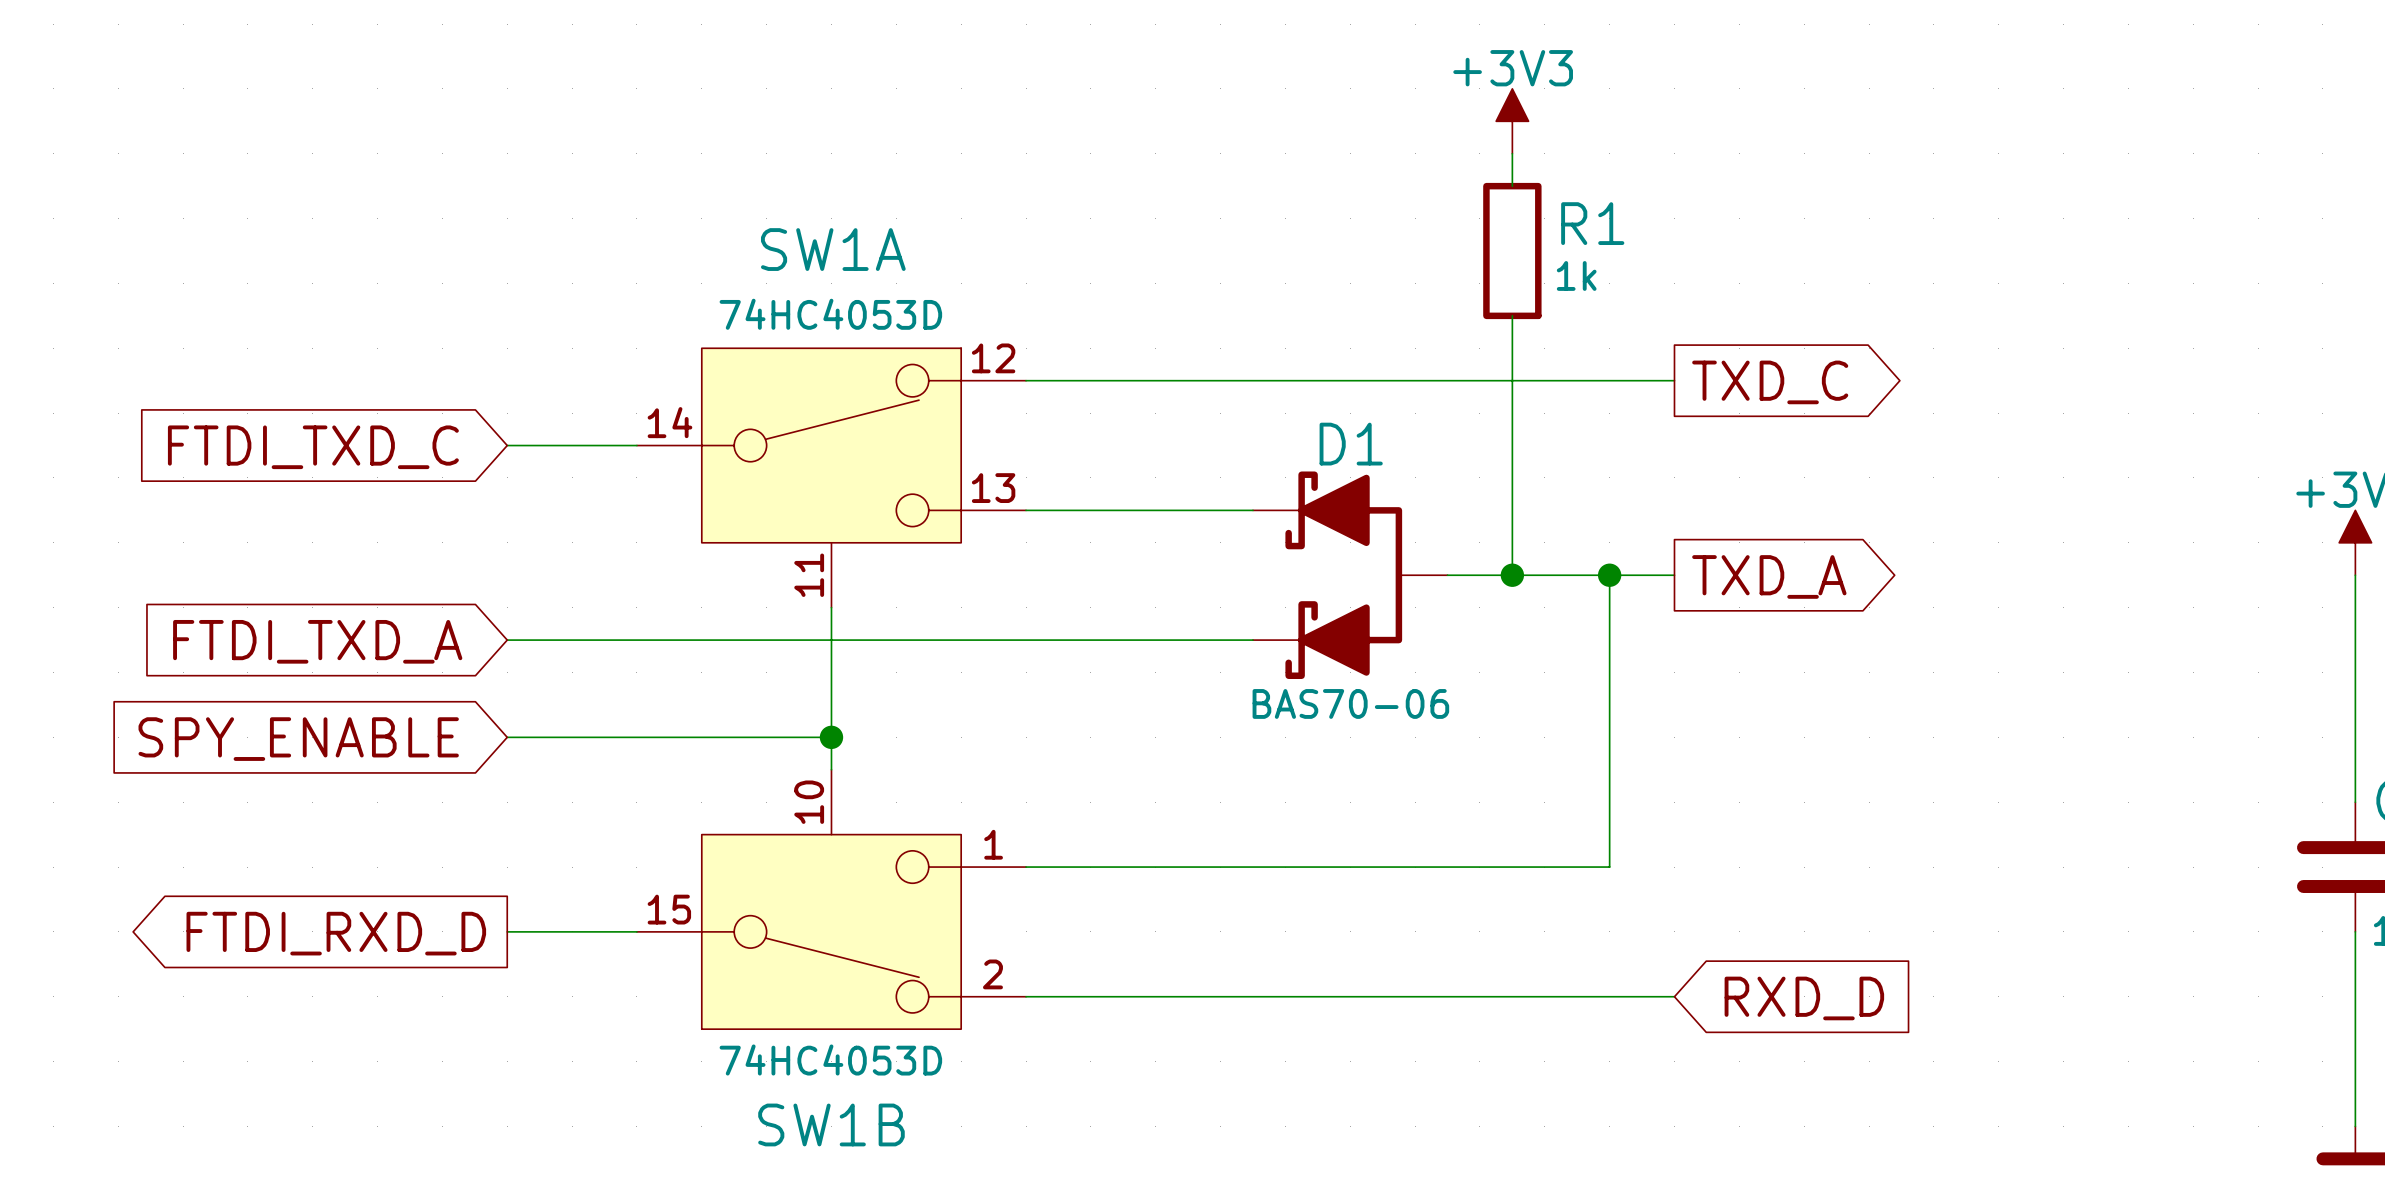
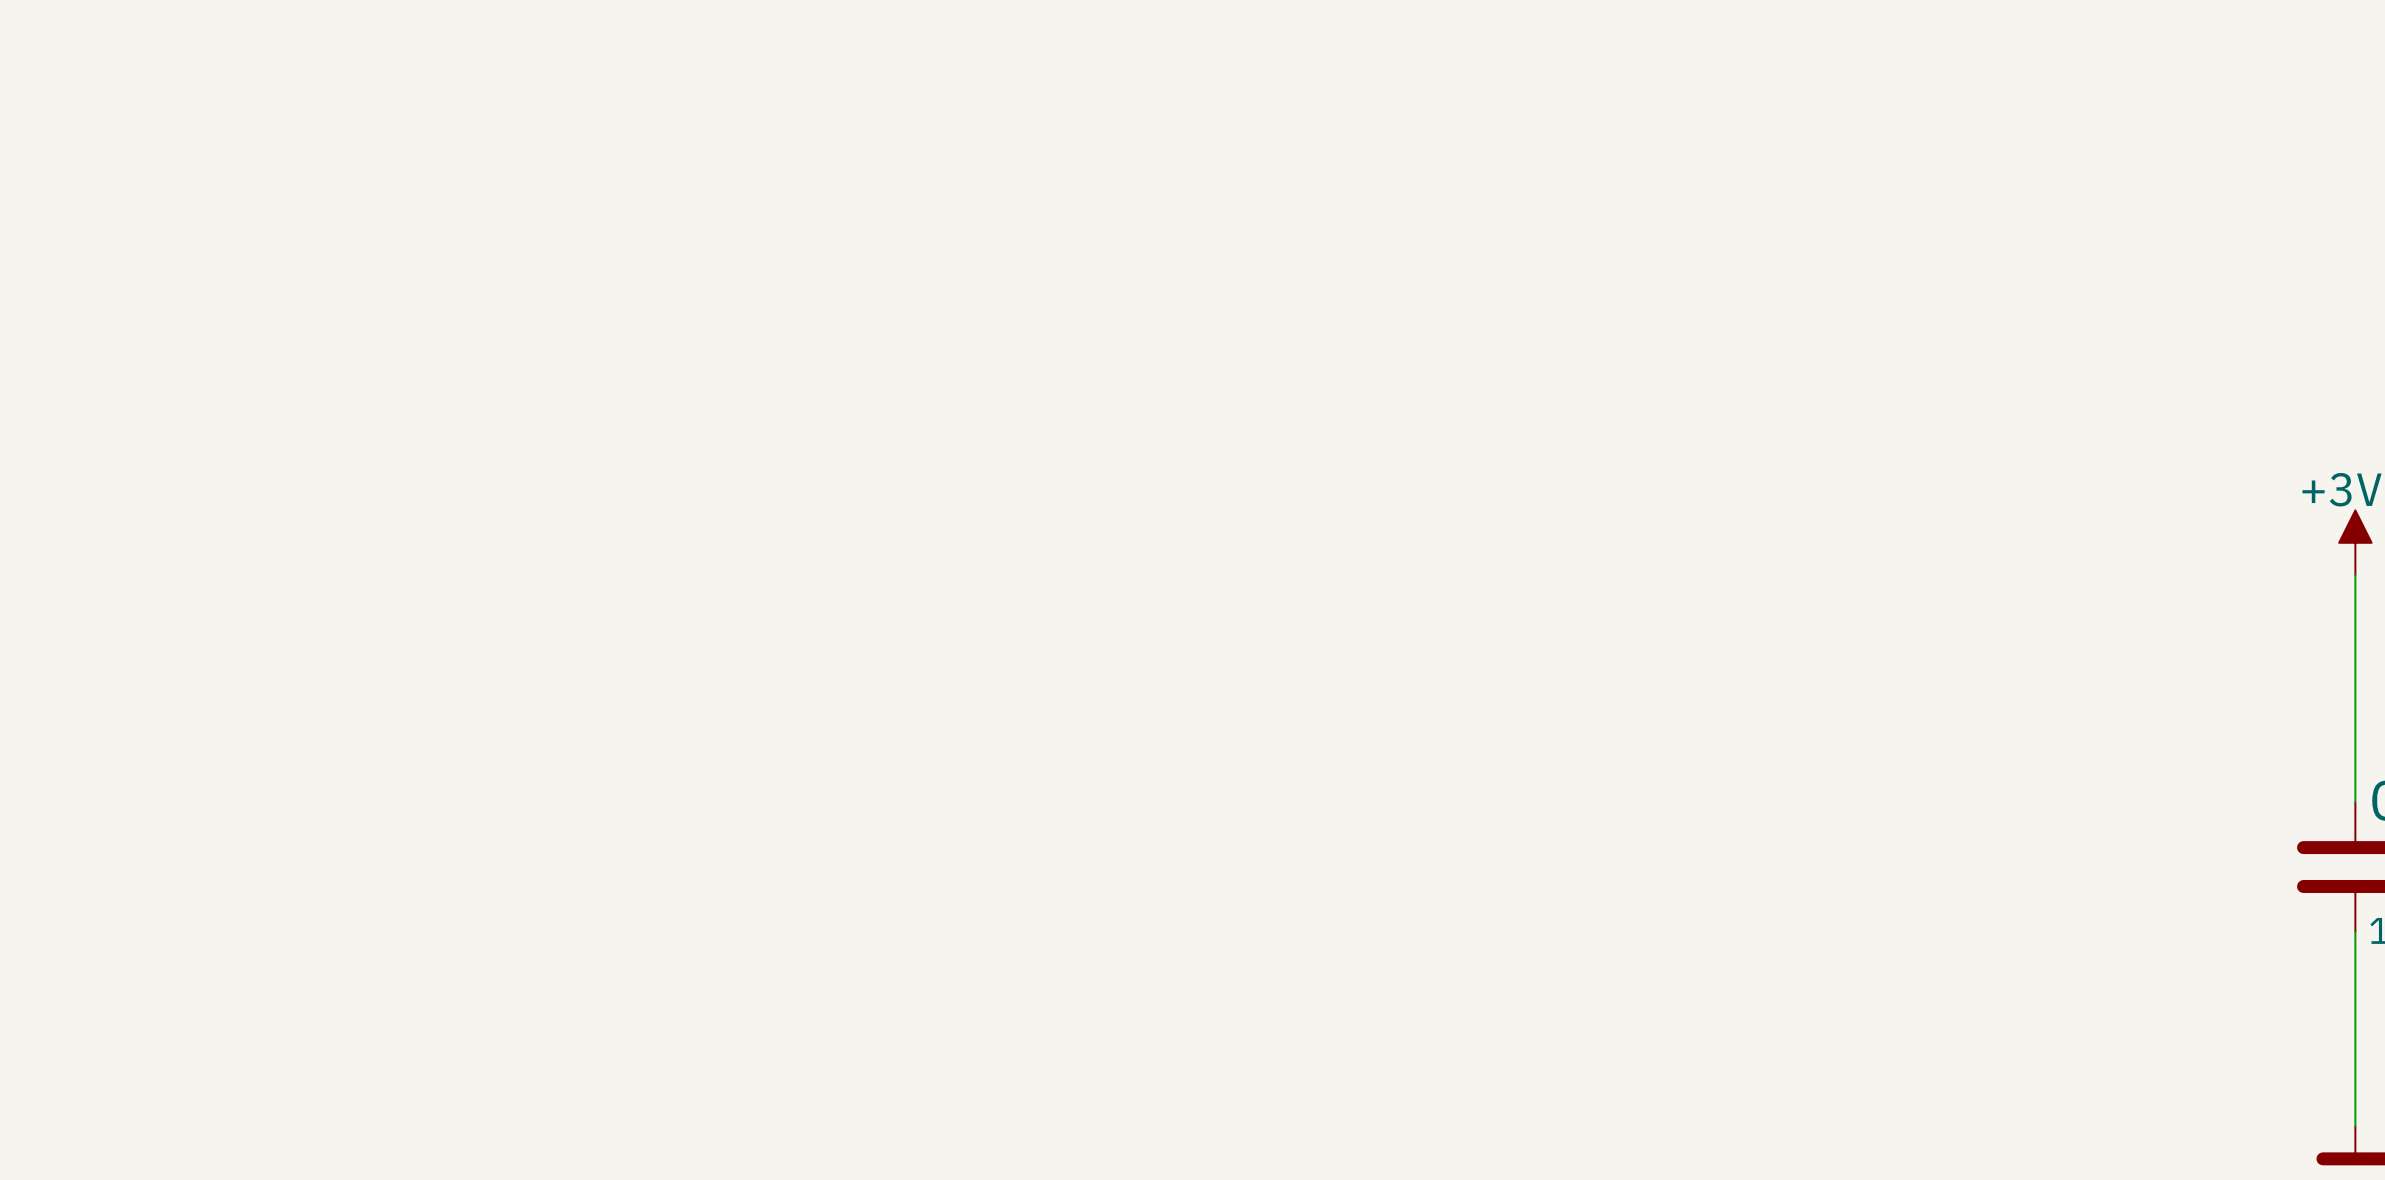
power symbol: +3V3 (1512, 121) -> none
wire: (1512, 153) (1512, 186) -> none
R1: 1k (1512, 251) -> none
wire: (1512, 315) (1512, 575) -> none
wire: (1026, 380) (1674, 380) -> none
global label: TXD_C (1770, 382) -> none
wire: (507, 445) (636, 445) -> none
global label: FTDI_TXD_C (313, 447) -> none
SW1A: 74HC4053D (831, 477) -> none
wire: (1026, 510) (1252, 510) -> none
D1: BAS70-06 (1350, 575) -> none
wire: (1447, 575) (1674, 575) -> none
junction: (1512, 575) -> none
wire: (1609, 575) (1609, 867) (1026, 867) -> none
junction: (1609, 575) -> none
global label: TXD_A (1769, 576) -> none
wire: (831, 607) (831, 769) -> none
wire: (507, 640) (1252, 640) -> none
global label: FTDI_TXD_A (317, 641) -> none
wire: (507, 737) (831, 737) -> none
junction: (831, 737) -> none
global label: SPY_ENABLE (298, 739) -> none
SW1B: 74HC4053D (831, 899) -> none
wire: (507, 931) (636, 931) -> none
global label: FTDI_RXD_D (336, 933) -> none
wire: (1026, 996) (1674, 996) -> none
global label: RXD_D (1804, 998) -> none

